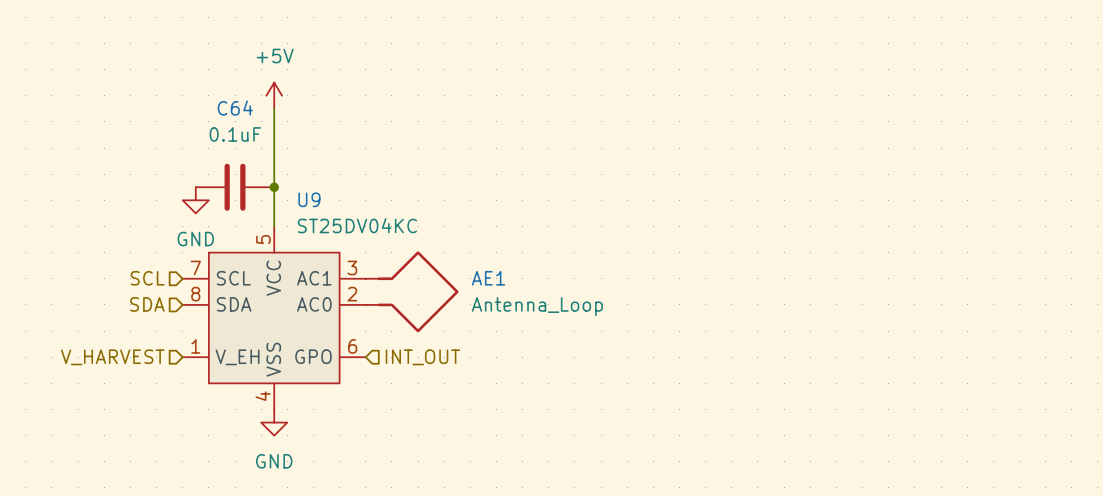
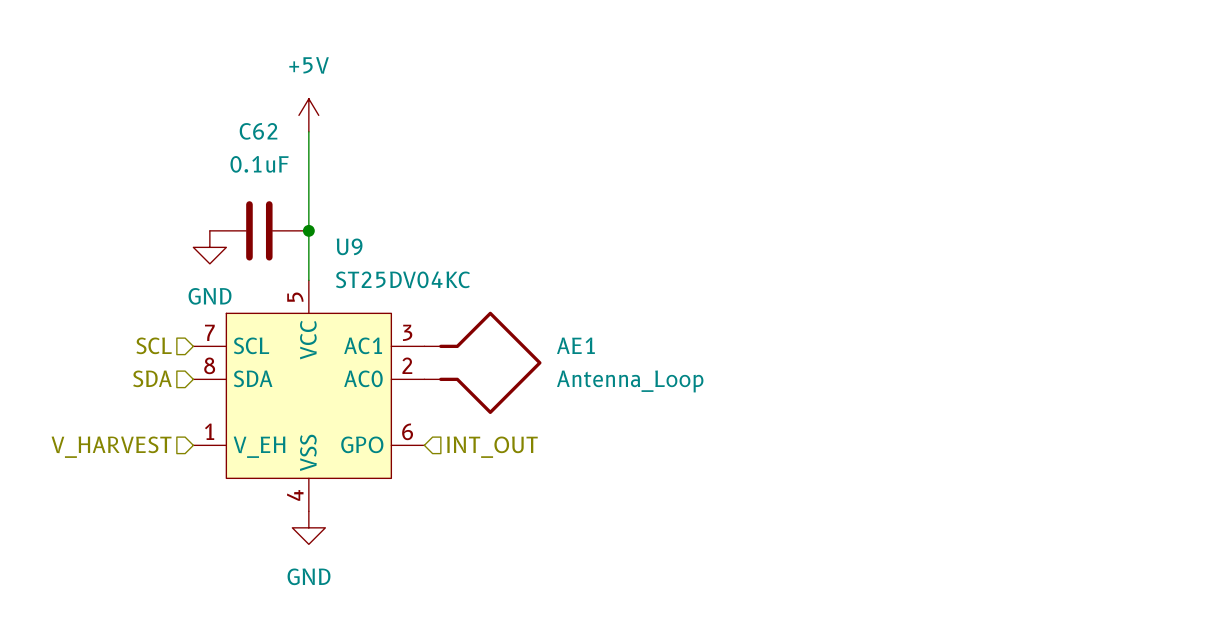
C64 name: C64 (235, 108) -> C62 (258, 131)

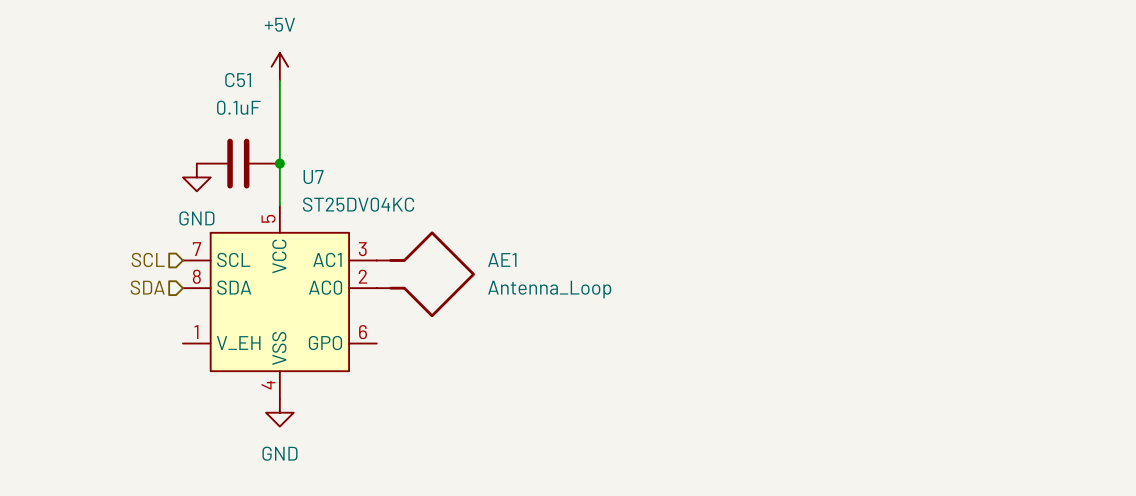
C62 name: C62 (258, 131) -> C51 (238, 80)
U9 name: U9 (349, 246) -> U7 (313, 177)
hierarchical label: V_HARVEST (111, 447) -> none
hierarchical label: INT_OUT (492, 447) -> none

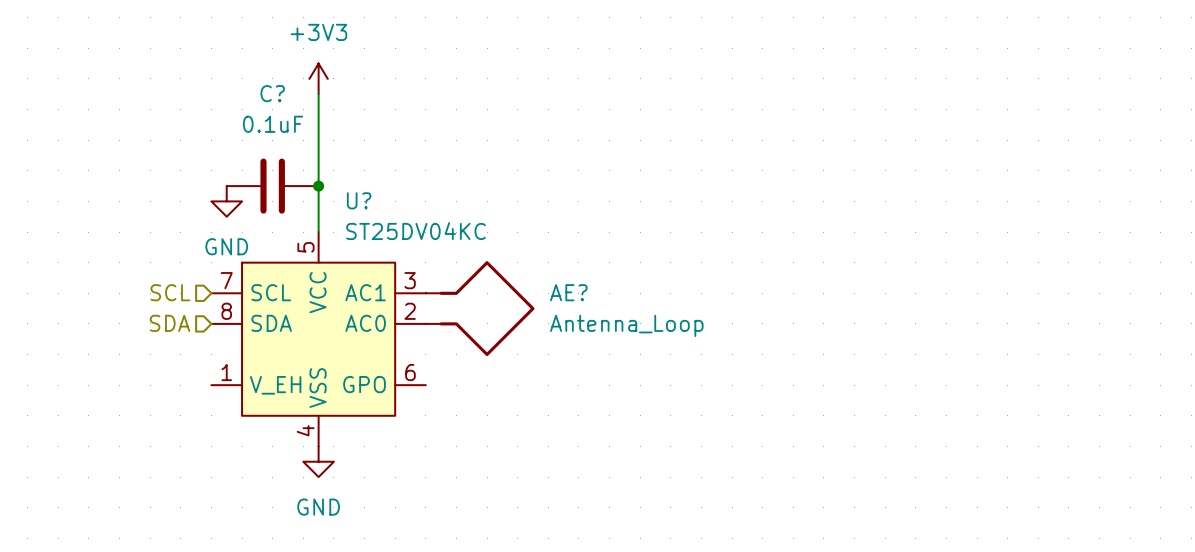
power symbol: +5V (279, 66) -> +3V3 (318, 78)
C51 name: C51 (238, 80) -> C? (272, 93)
U7 name: U7 (313, 177) -> U? (359, 200)
AE1 name: AE1 (502, 259) -> AE? (568, 292)

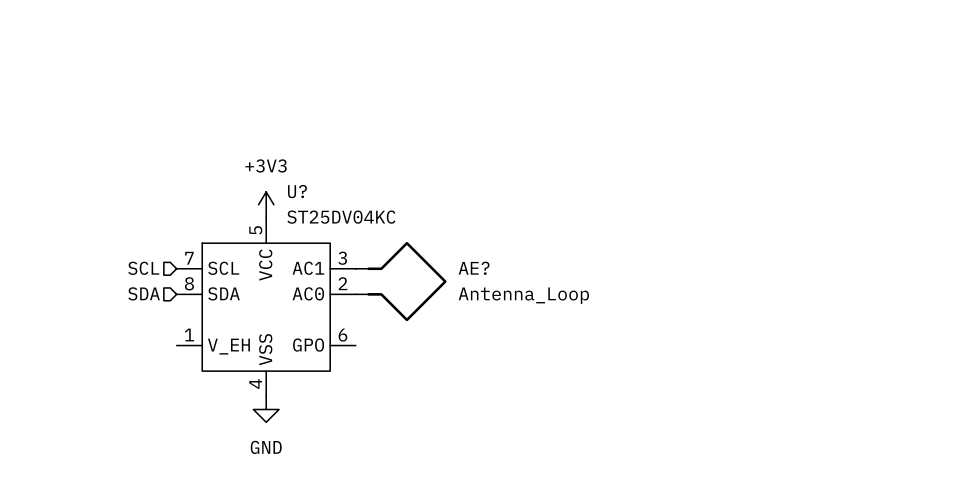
power symbol position: +3V3 (318, 78) -> +3V3 (266, 204)
wire: (318, 94) (318, 232) -> none
C?: 0.1uF (272, 186) -> none
junction: (318, 186) -> none
power symbol: GND (226, 201) -> none

